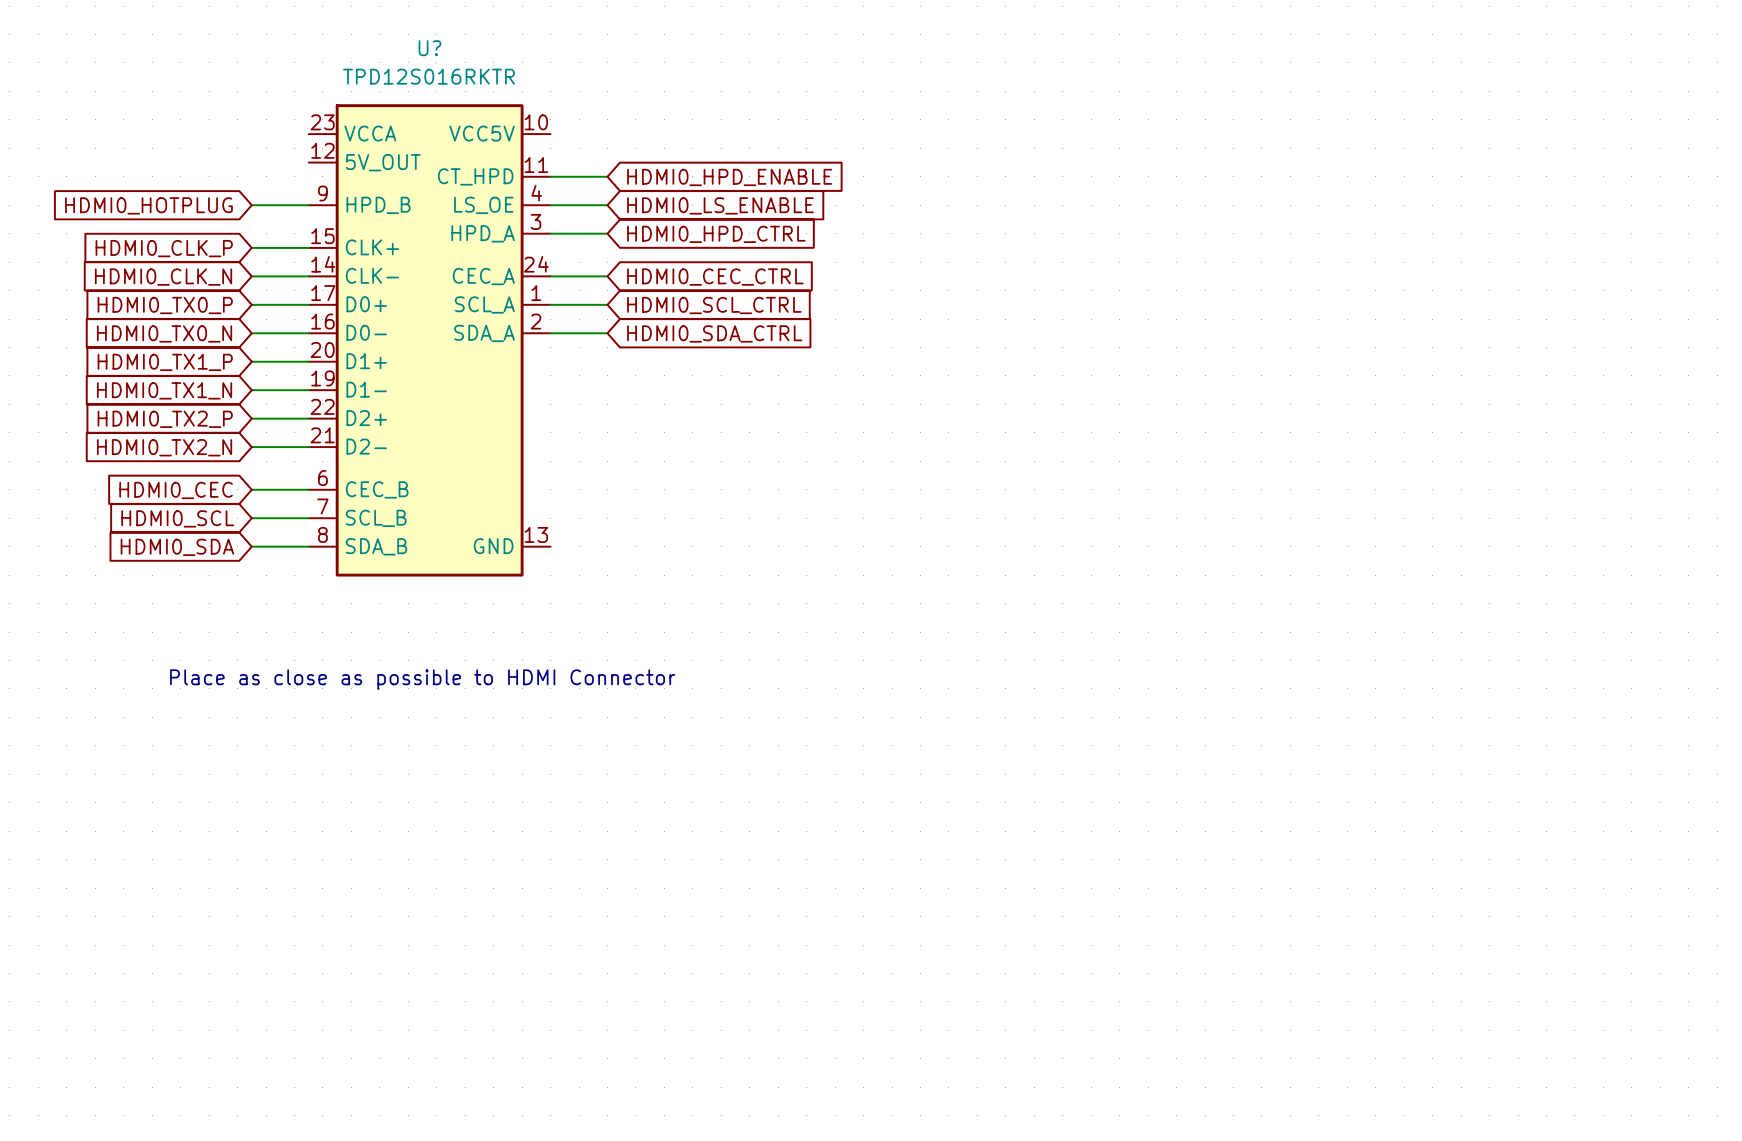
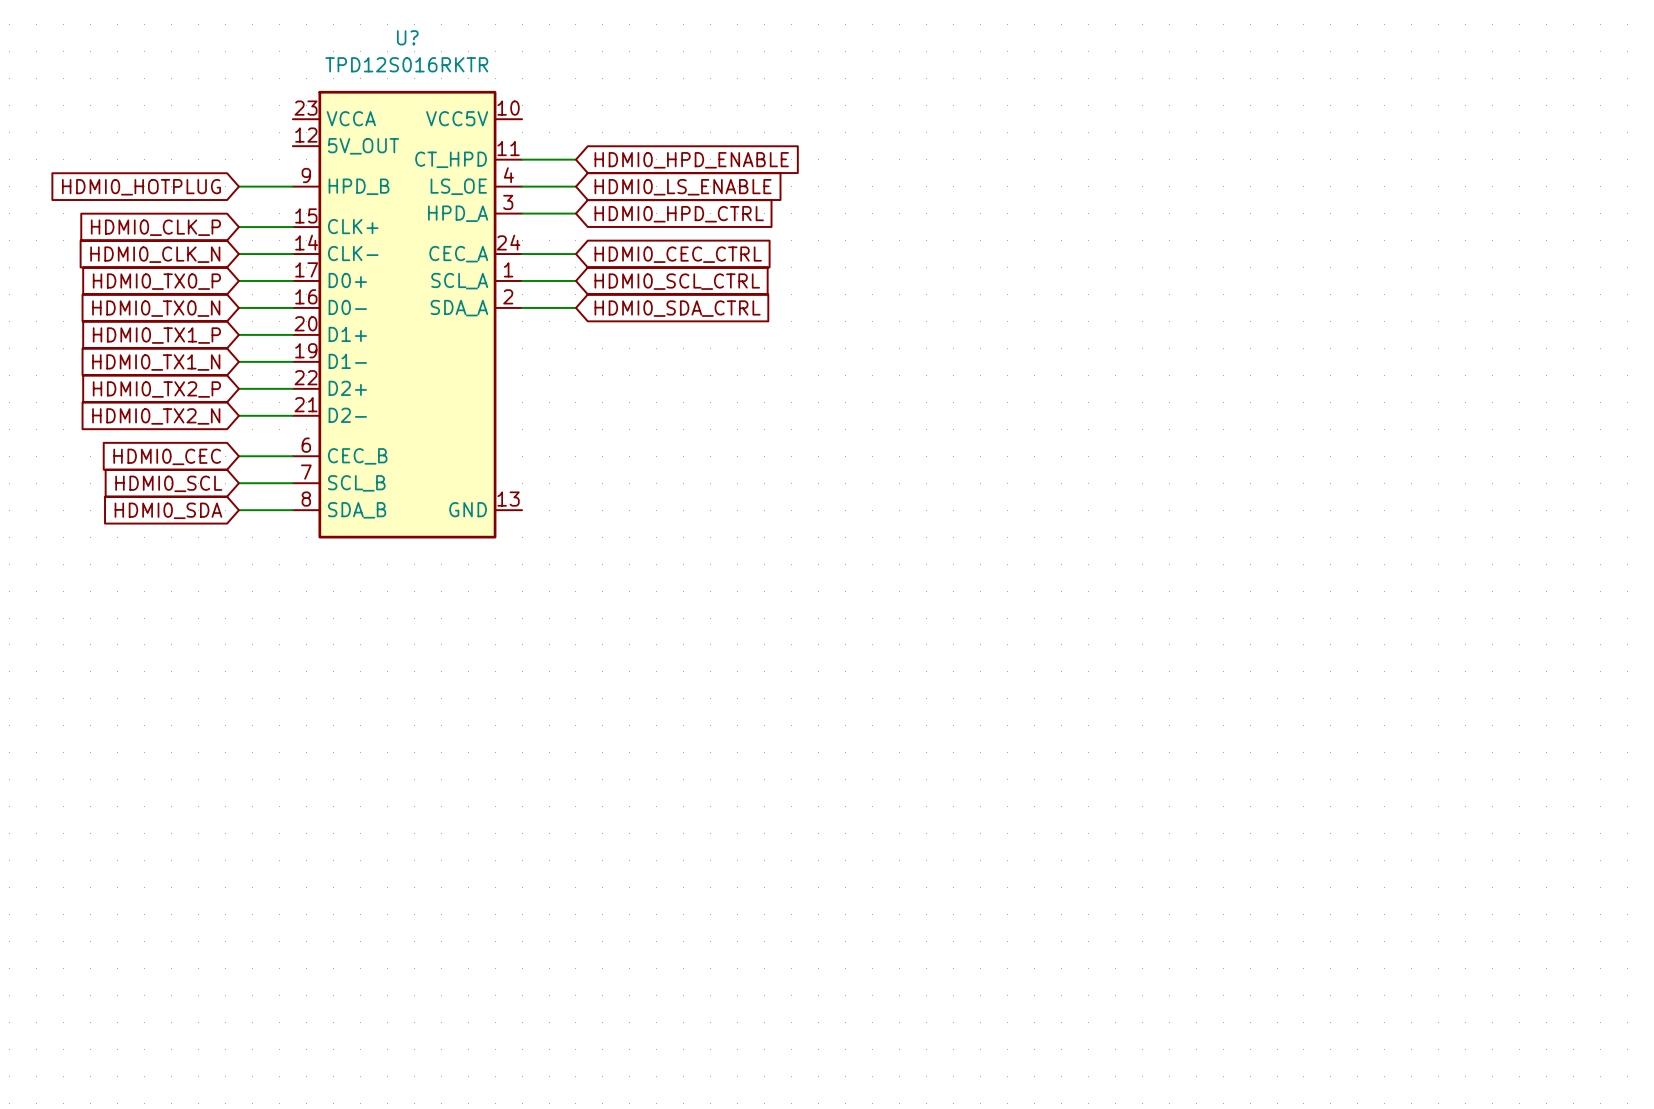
text: Place as close as possible to HDMI Connector (422, 679) -> none

